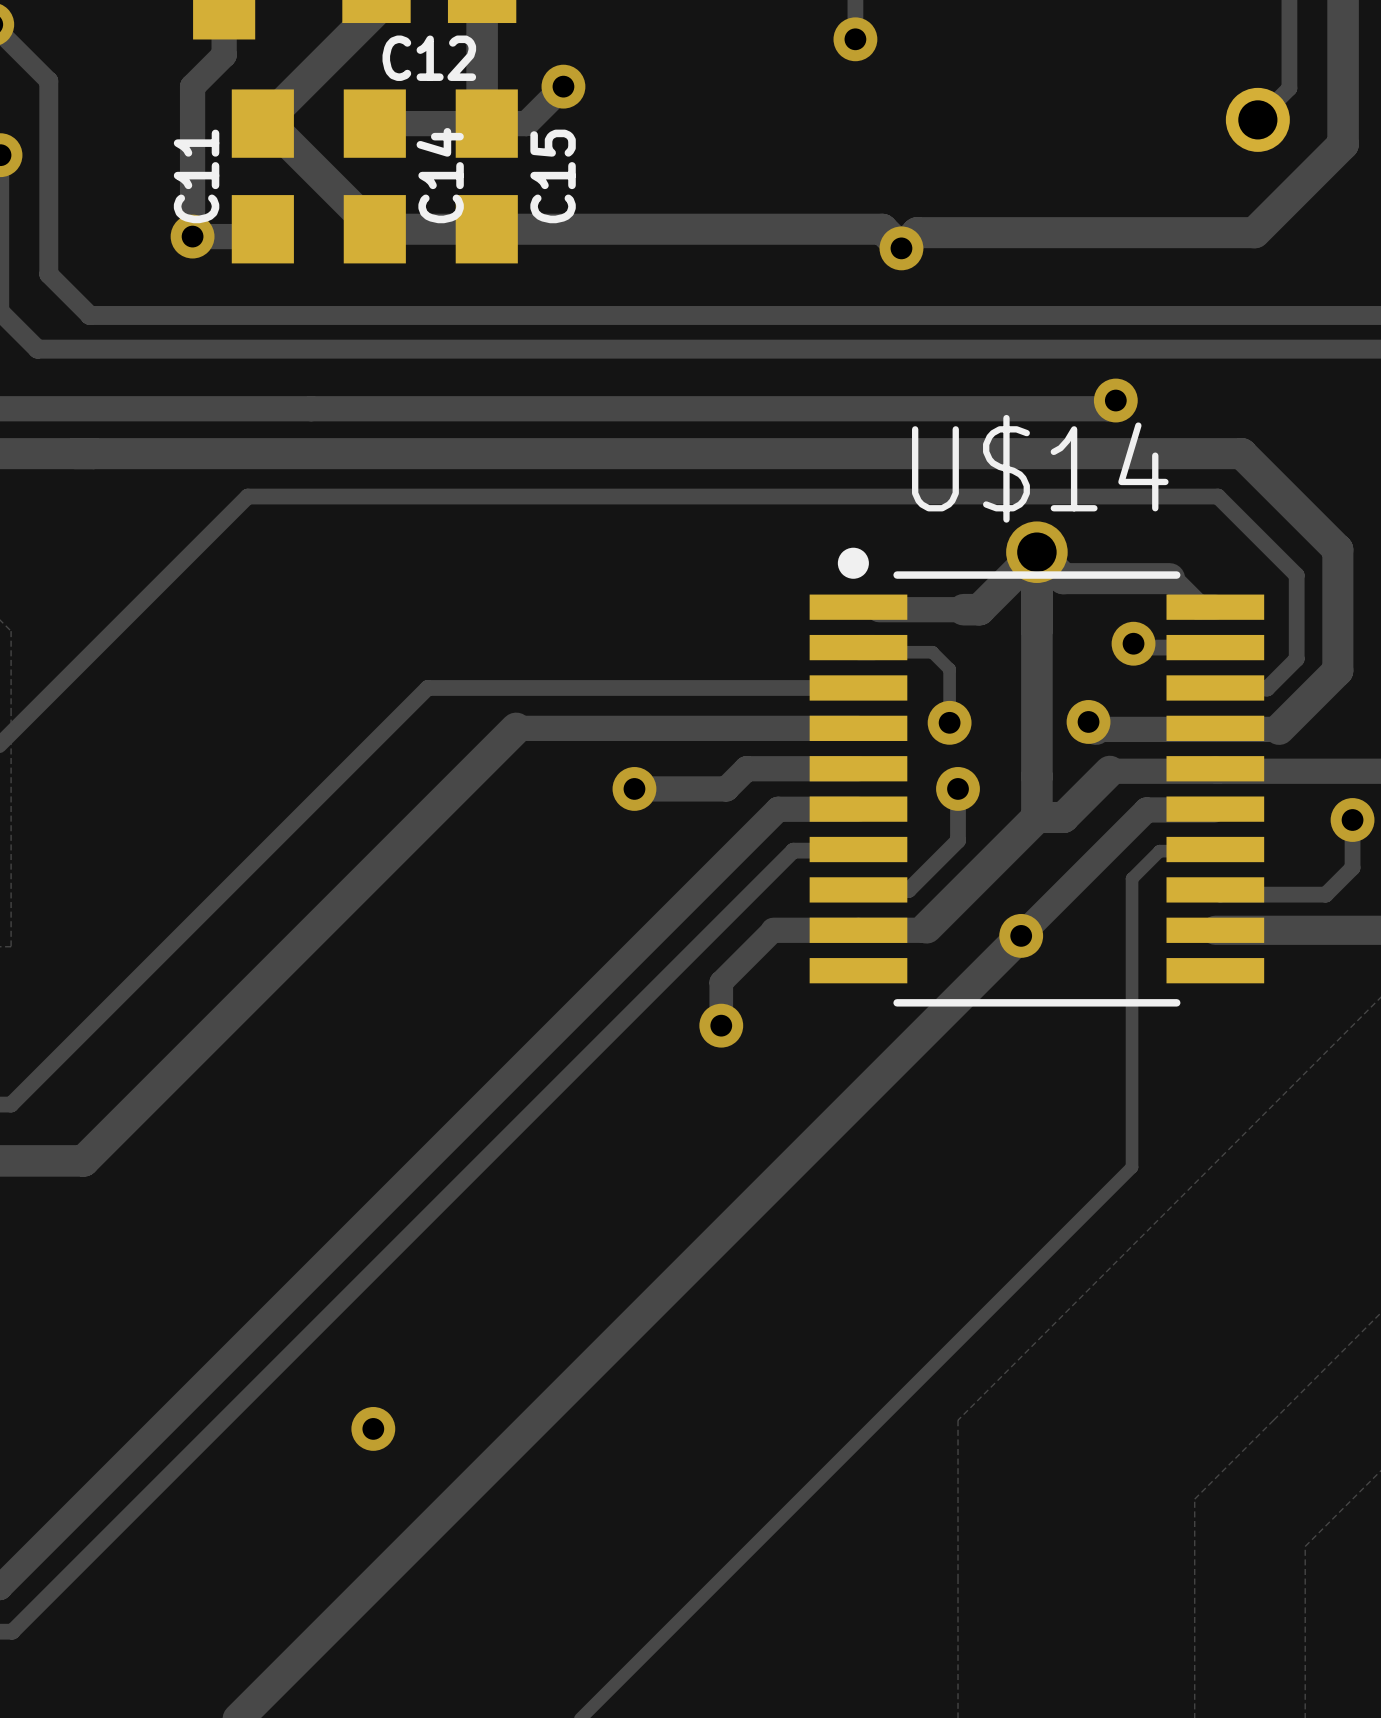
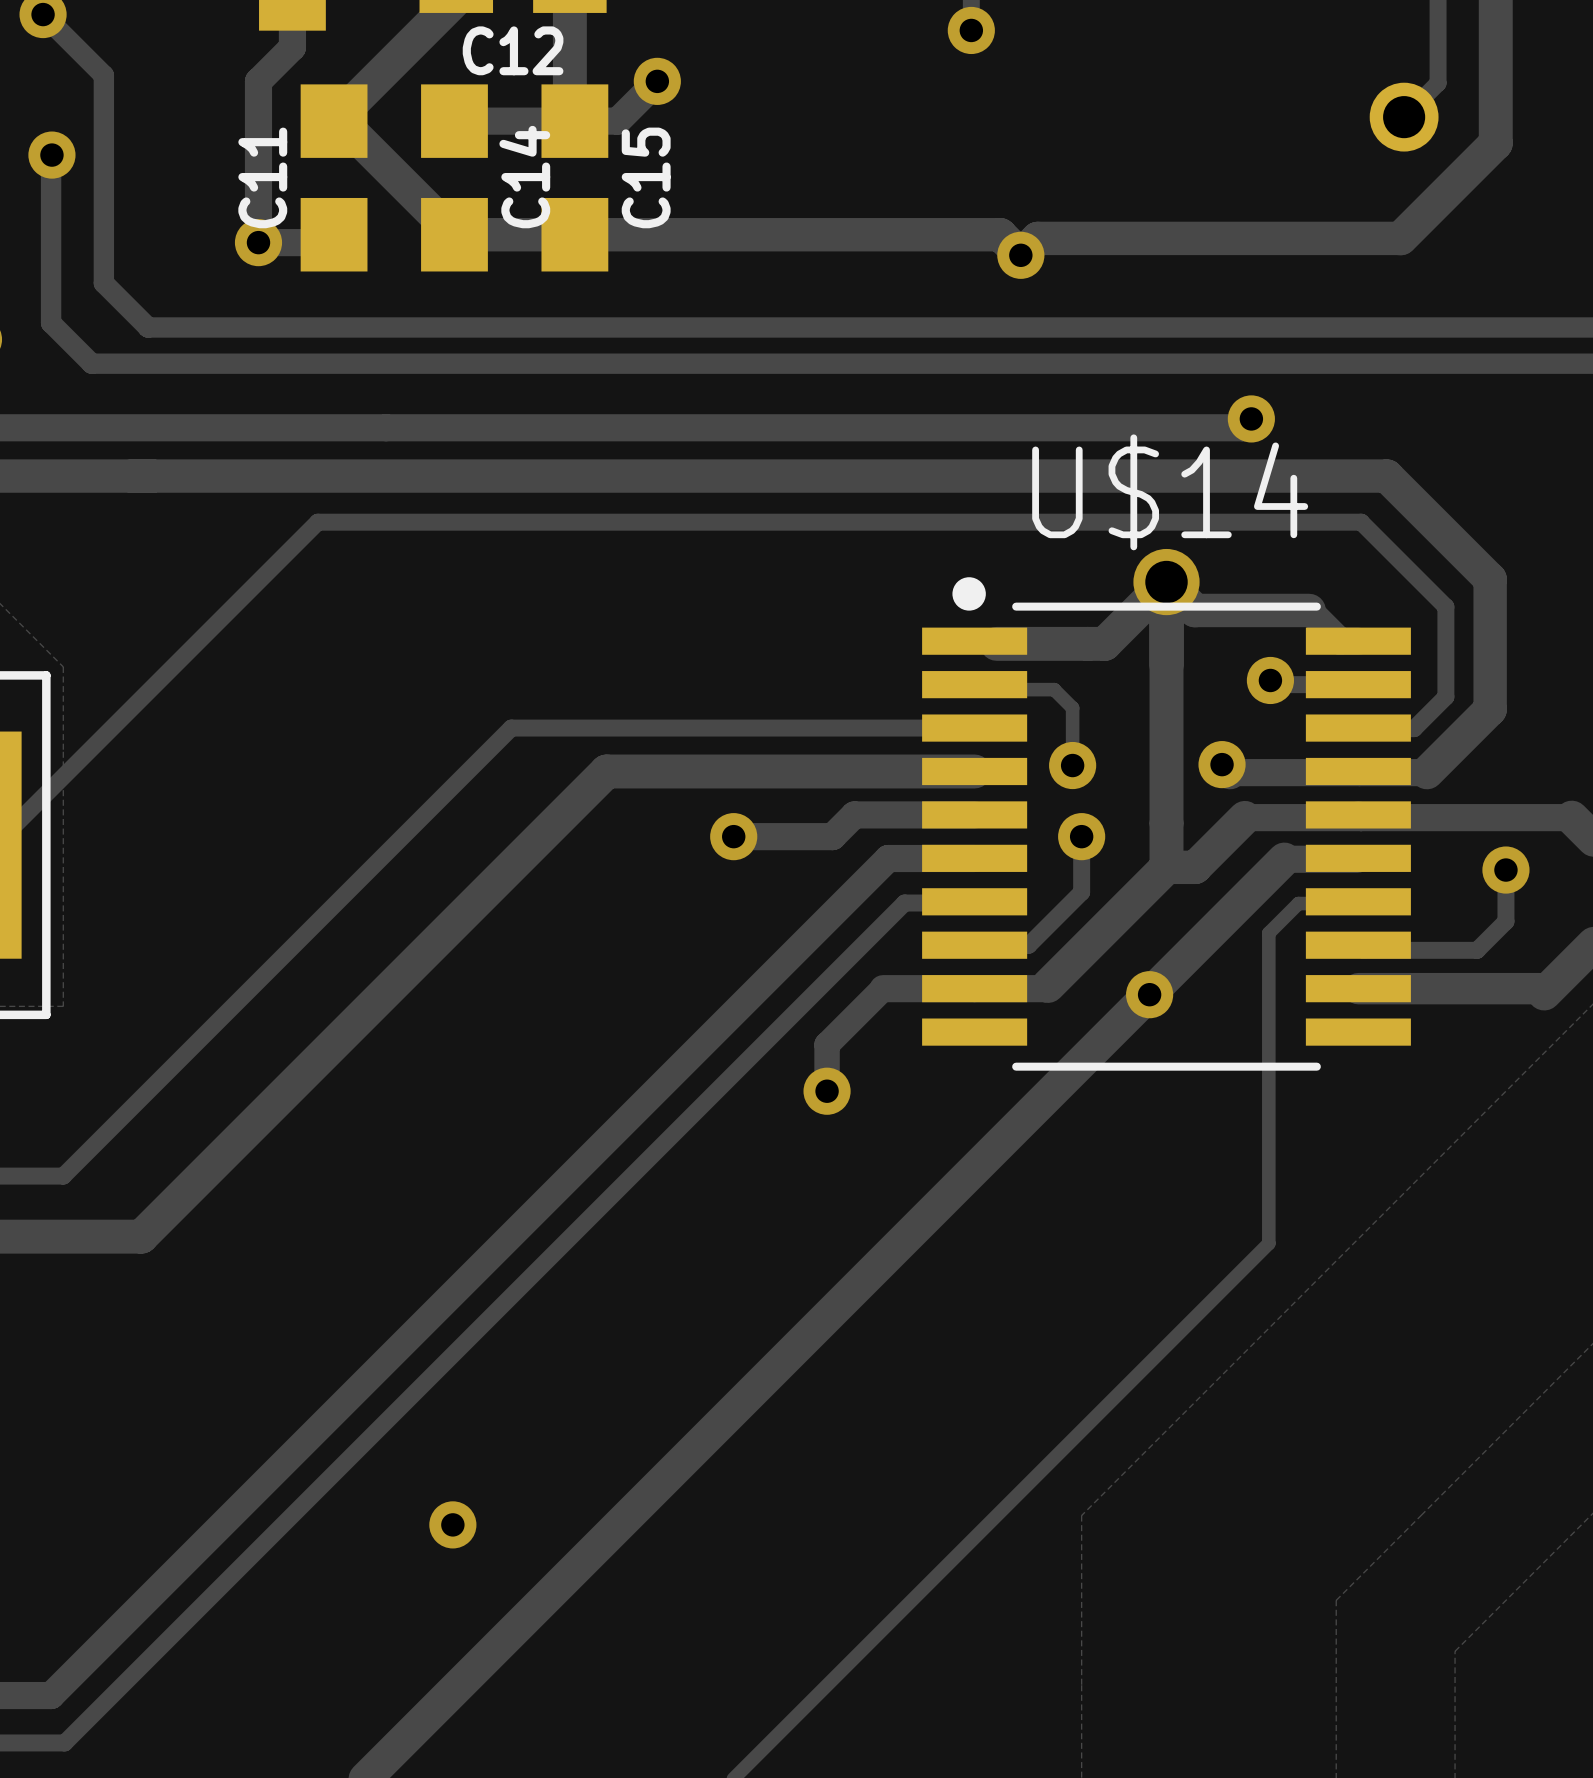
track width: thin (963, 609) (879, 609) -> thick (1087, 643) (996, 643)
track width: thin (858, 728) (516, 728) -> thick (974, 771) (606, 771)

